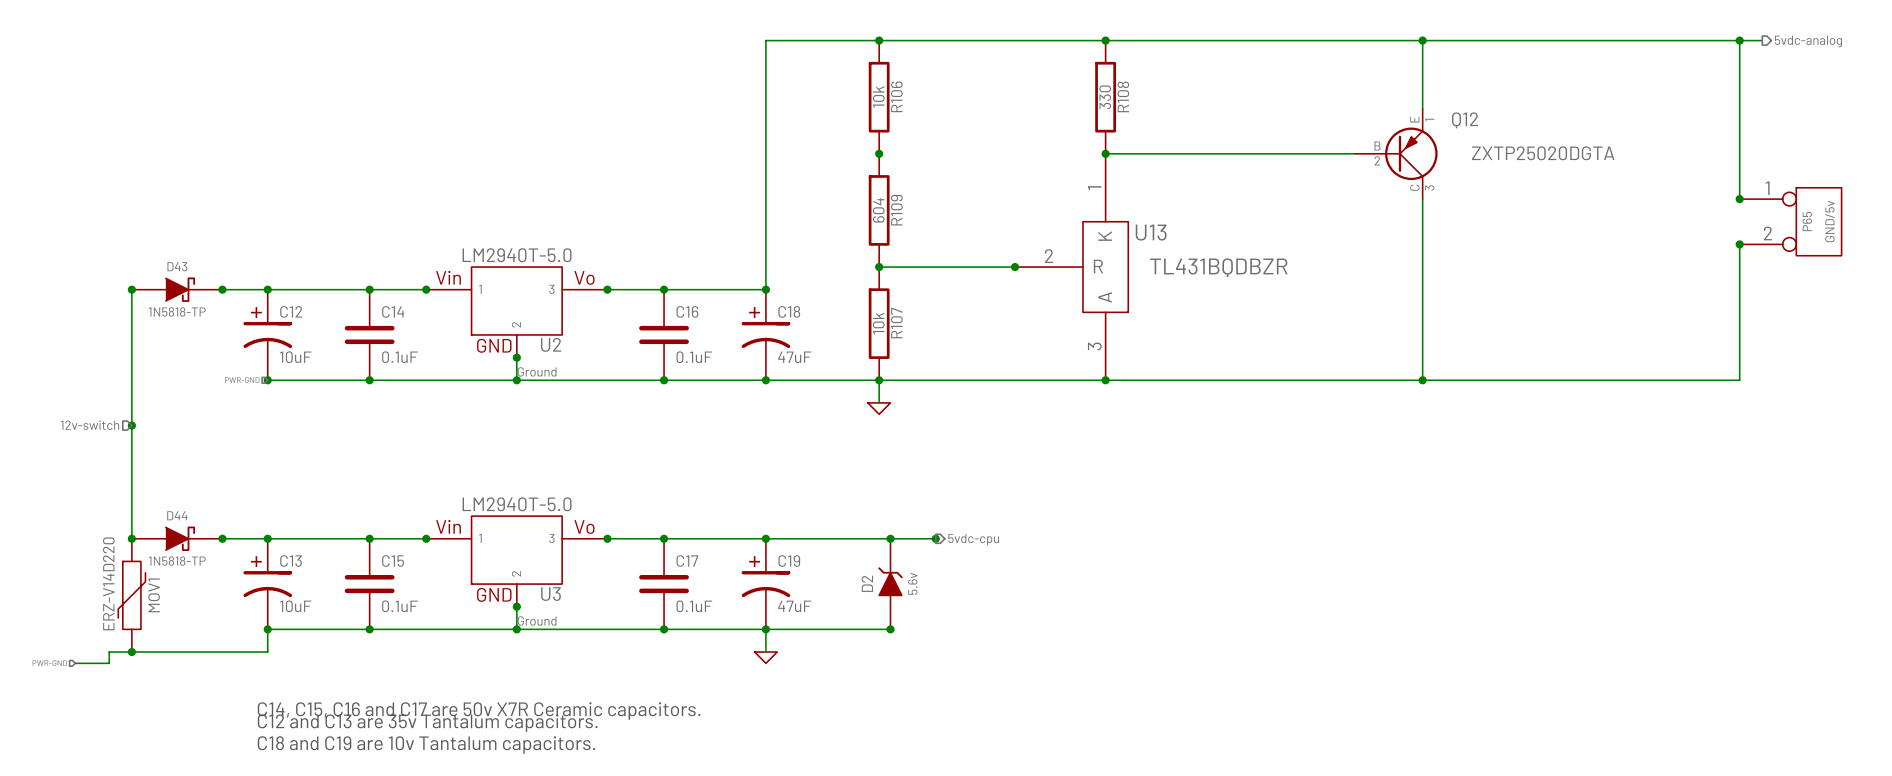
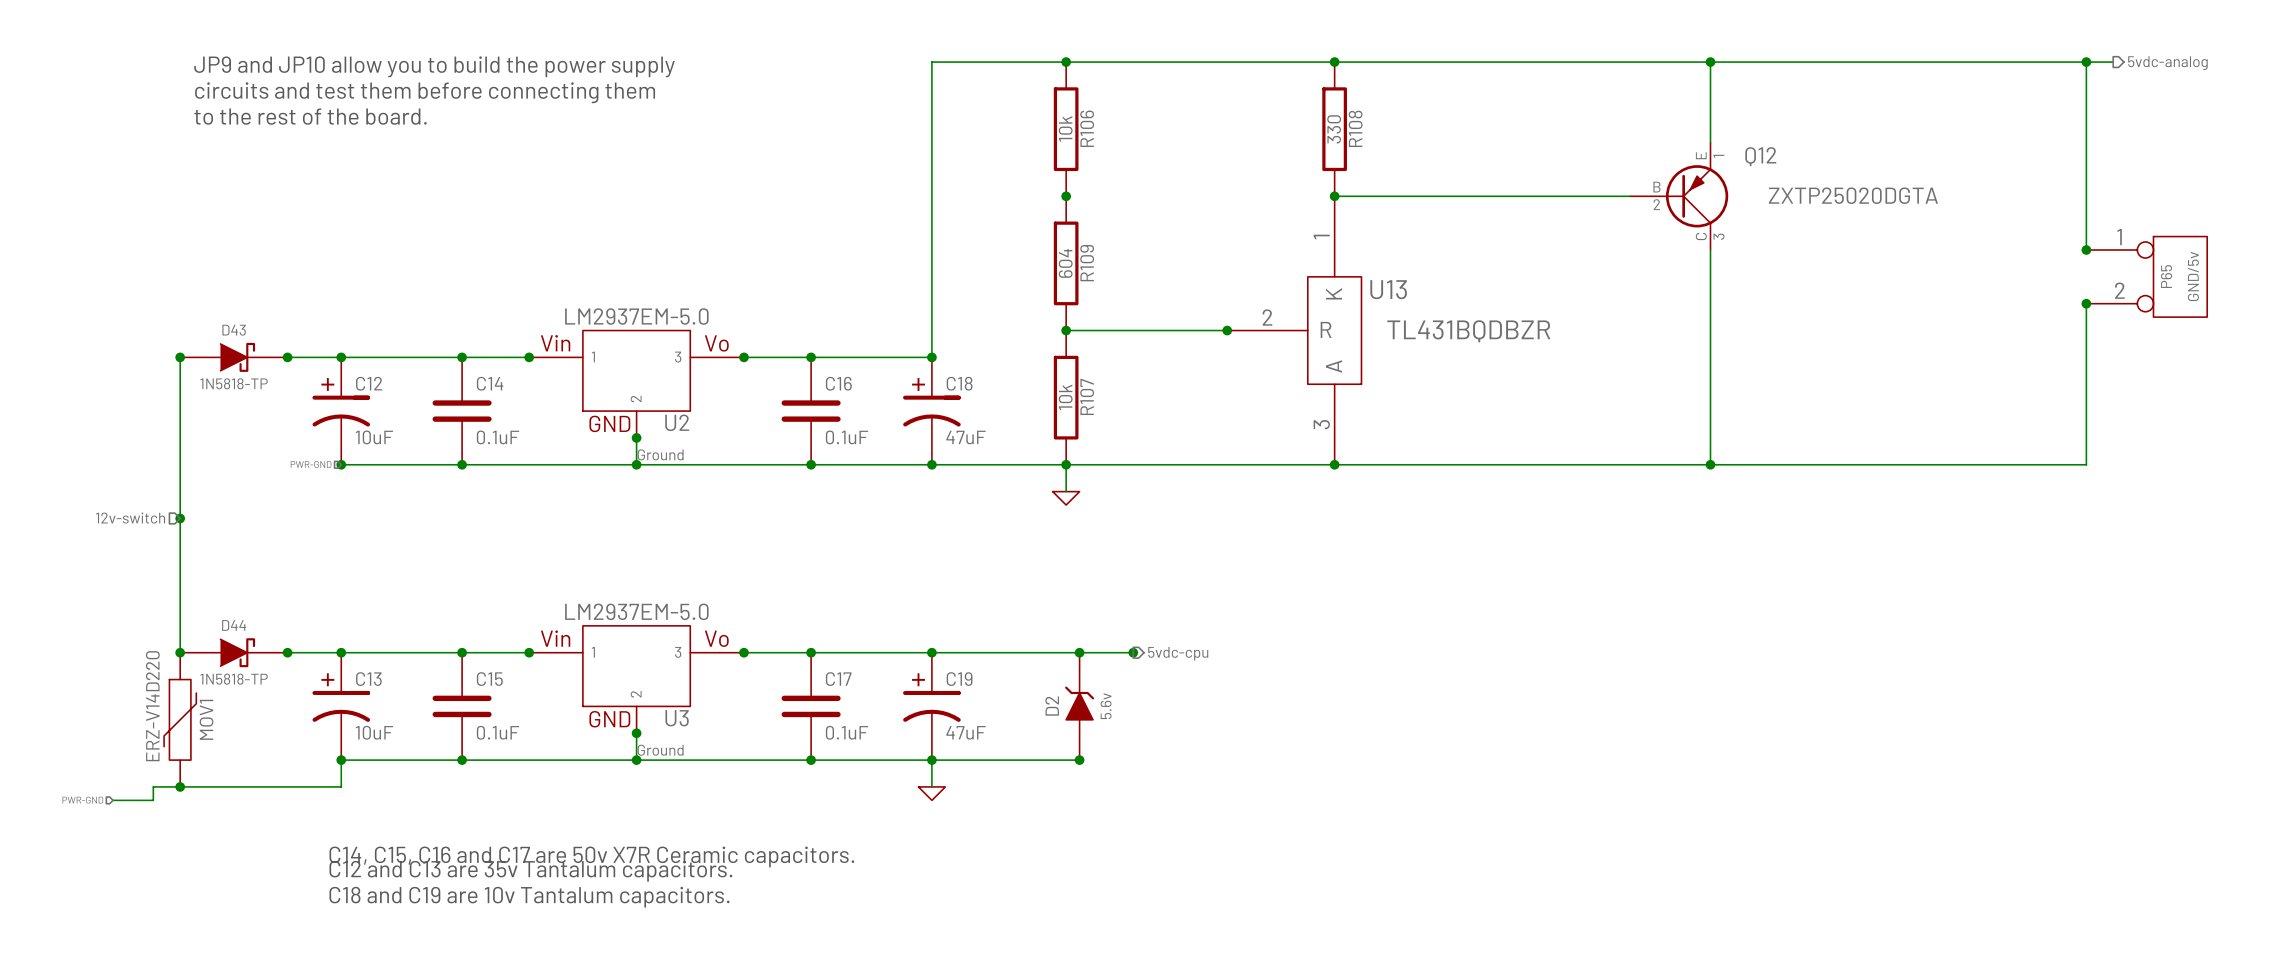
text: none -> JP9 and JP10 allow you to build the power supply (434, 66)
text: none -> circuits and test them before connecting them (425, 92)
text: none -> to the rest of the board. (310, 116)
U2 value: LM2940T-5.0 (517, 255) -> LM2937EM-5.0 (636, 316)
U3 value: LM2940T-5.0 (517, 504) -> LM2937EM-5.0 (636, 611)

